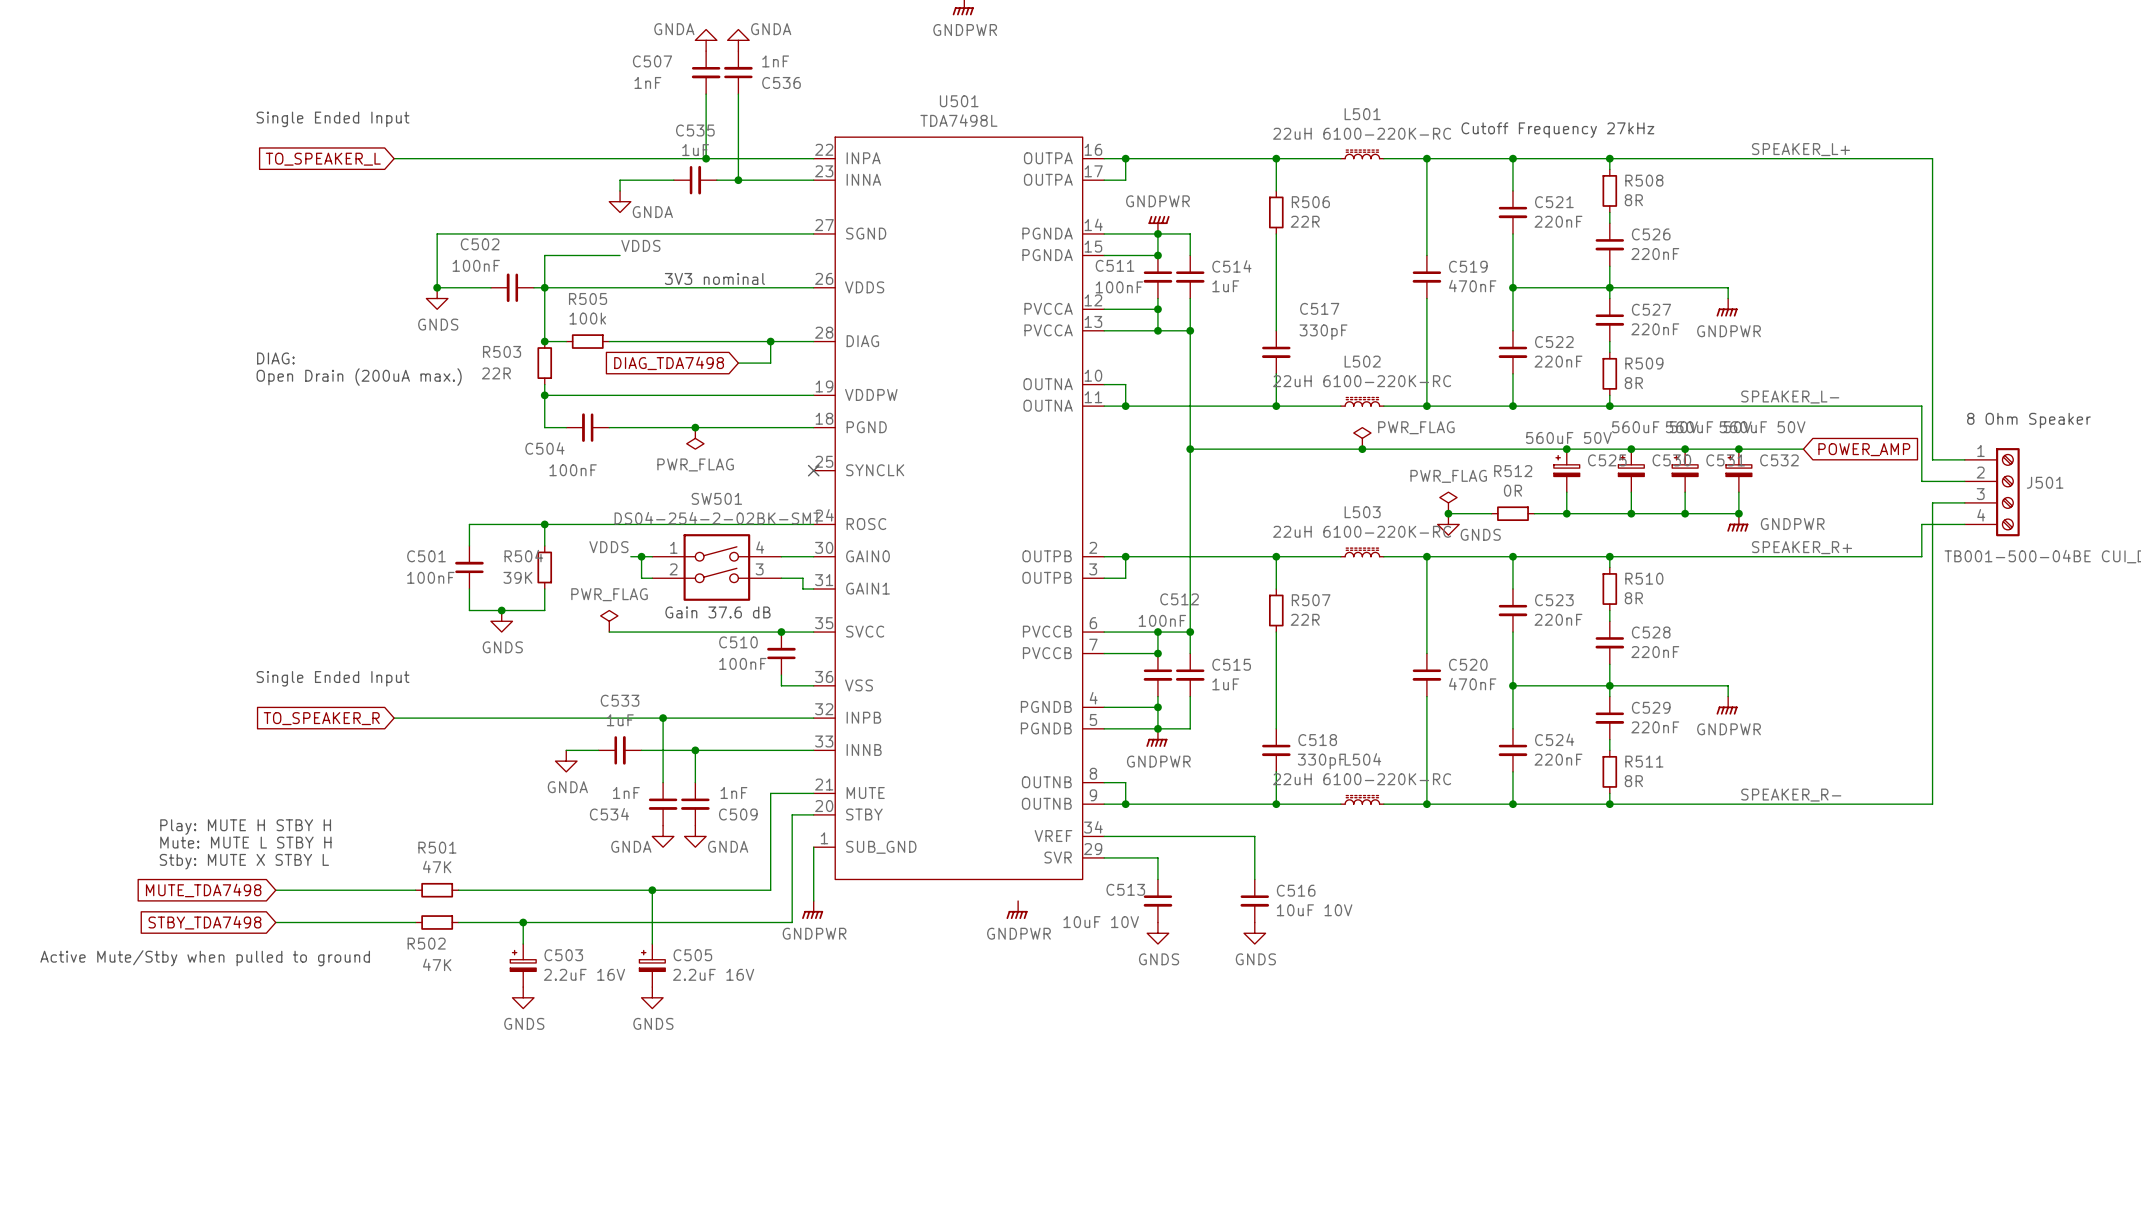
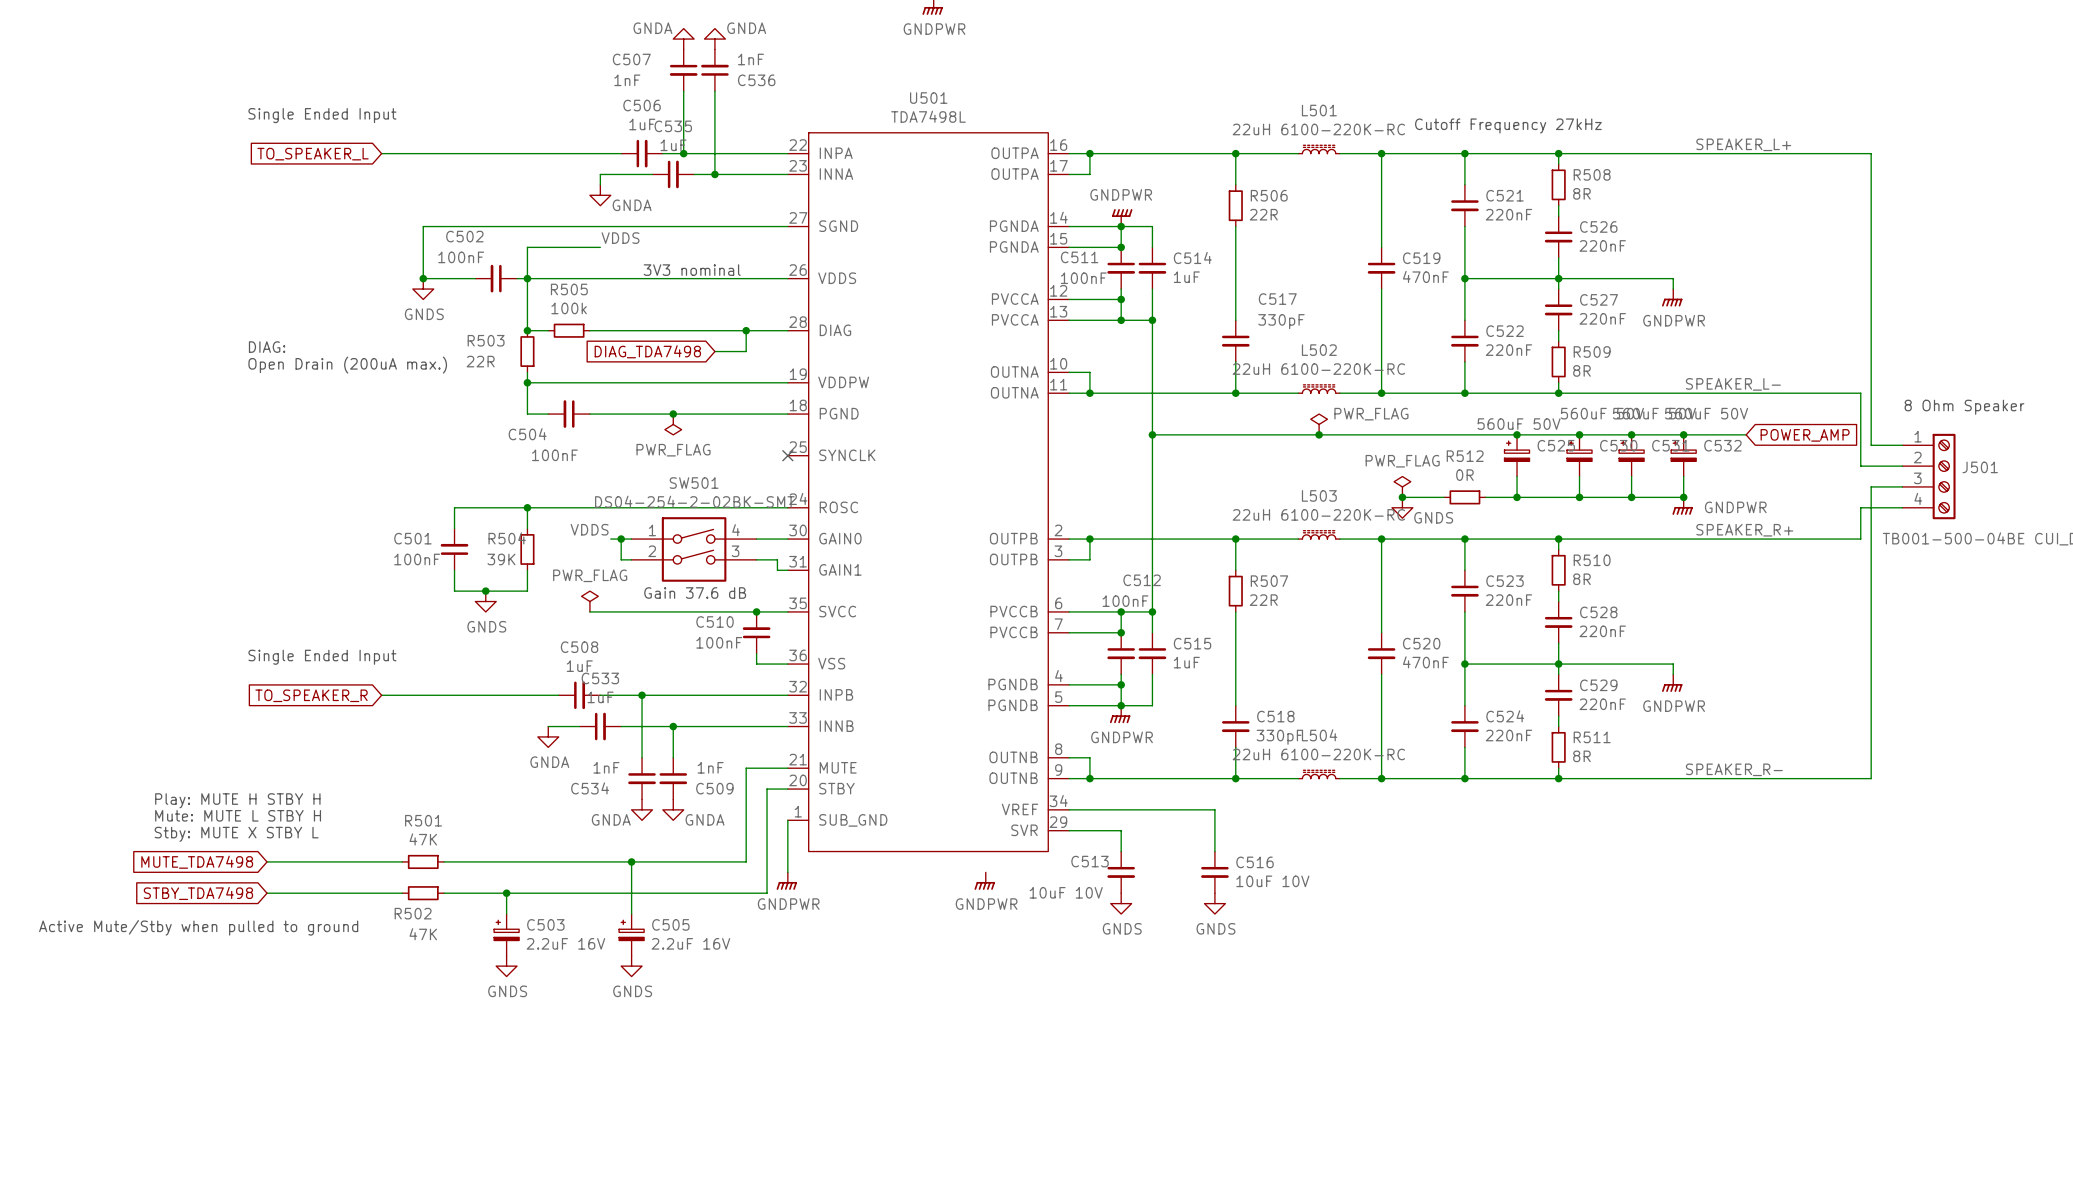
C506: none -> 1uF (642, 153)
C508: none -> 1uF (579, 695)

